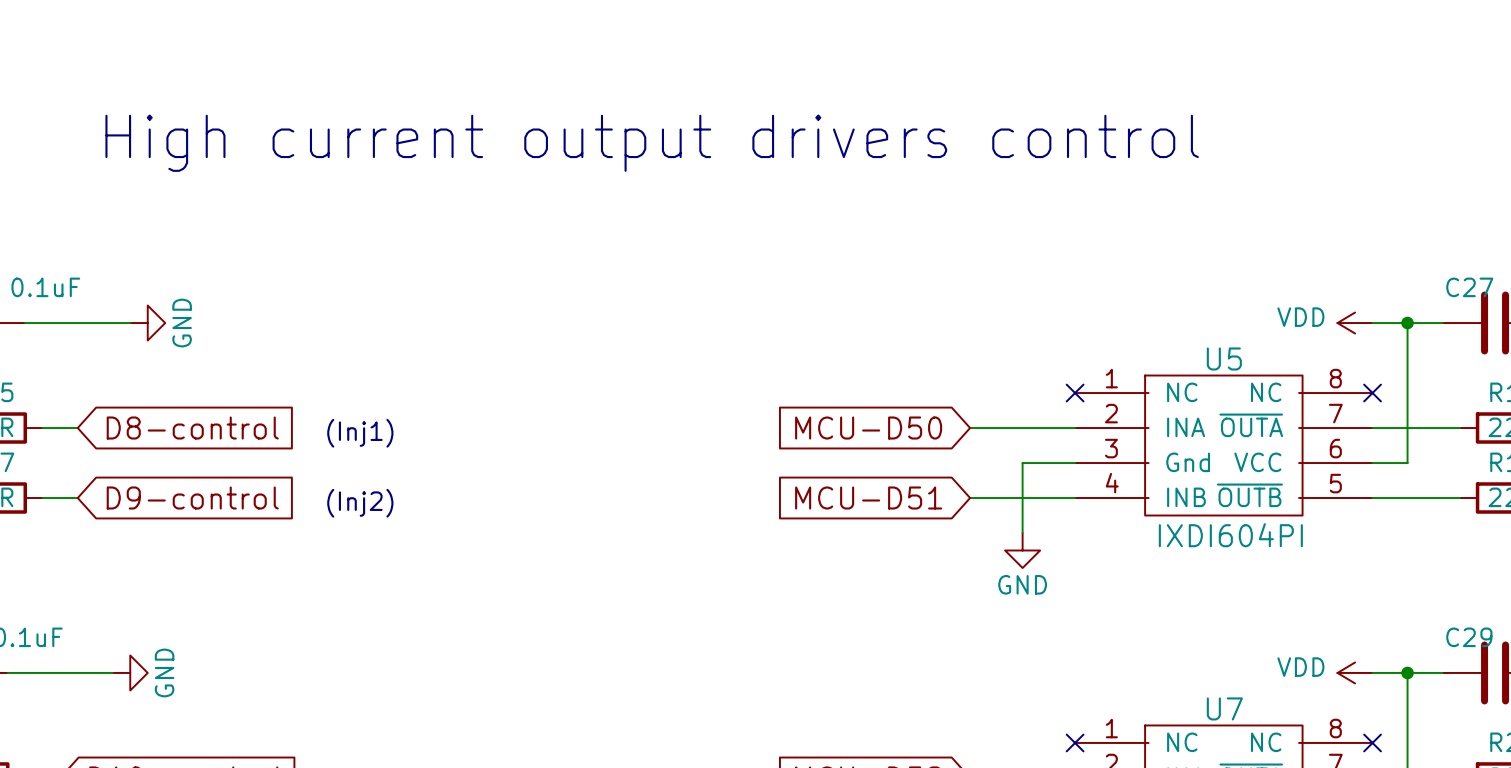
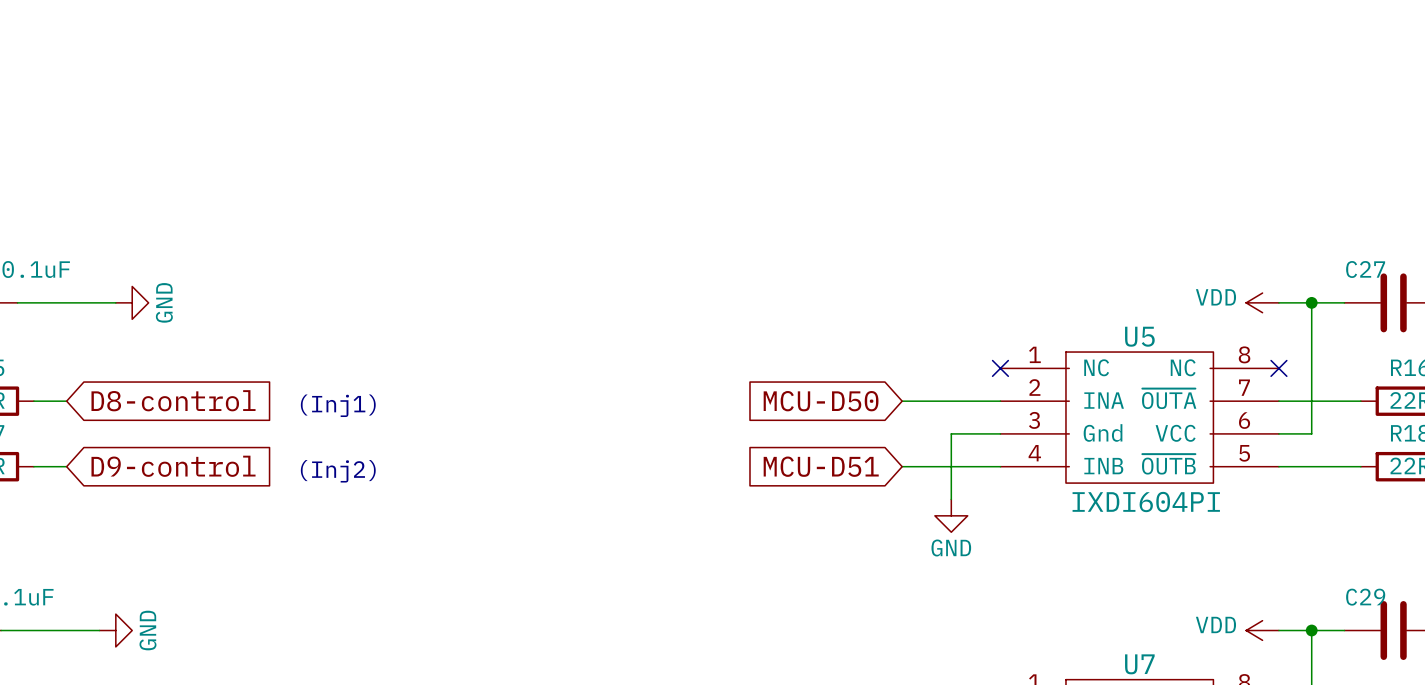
text: High current output drivers control (652, 143) -> none

